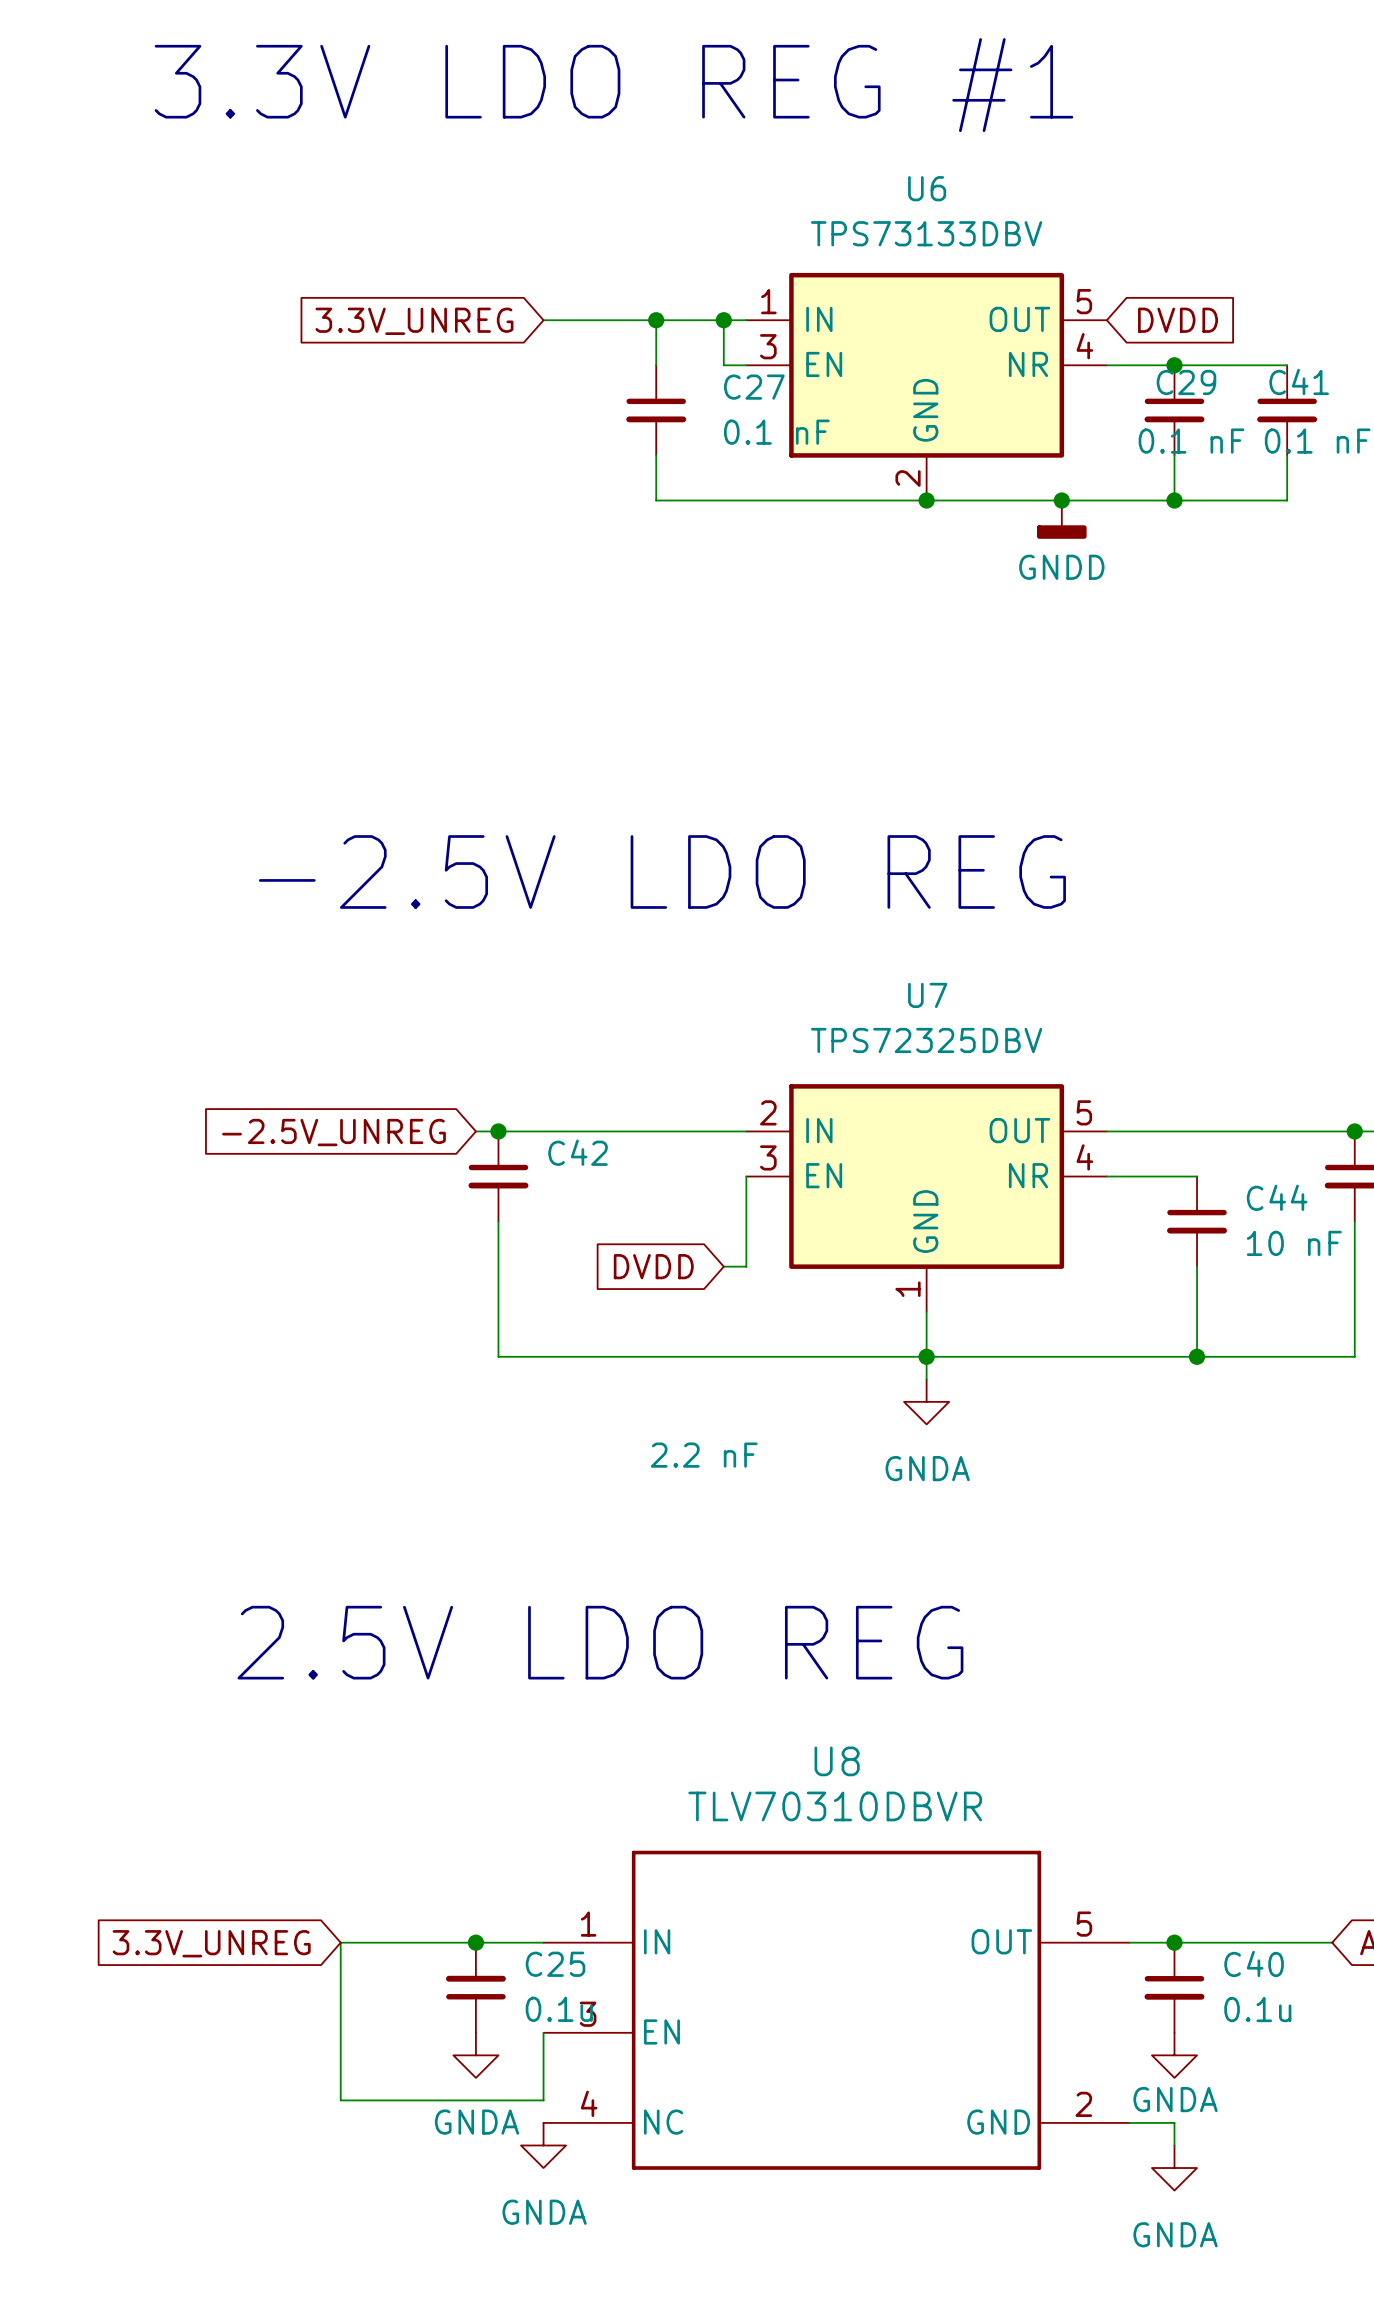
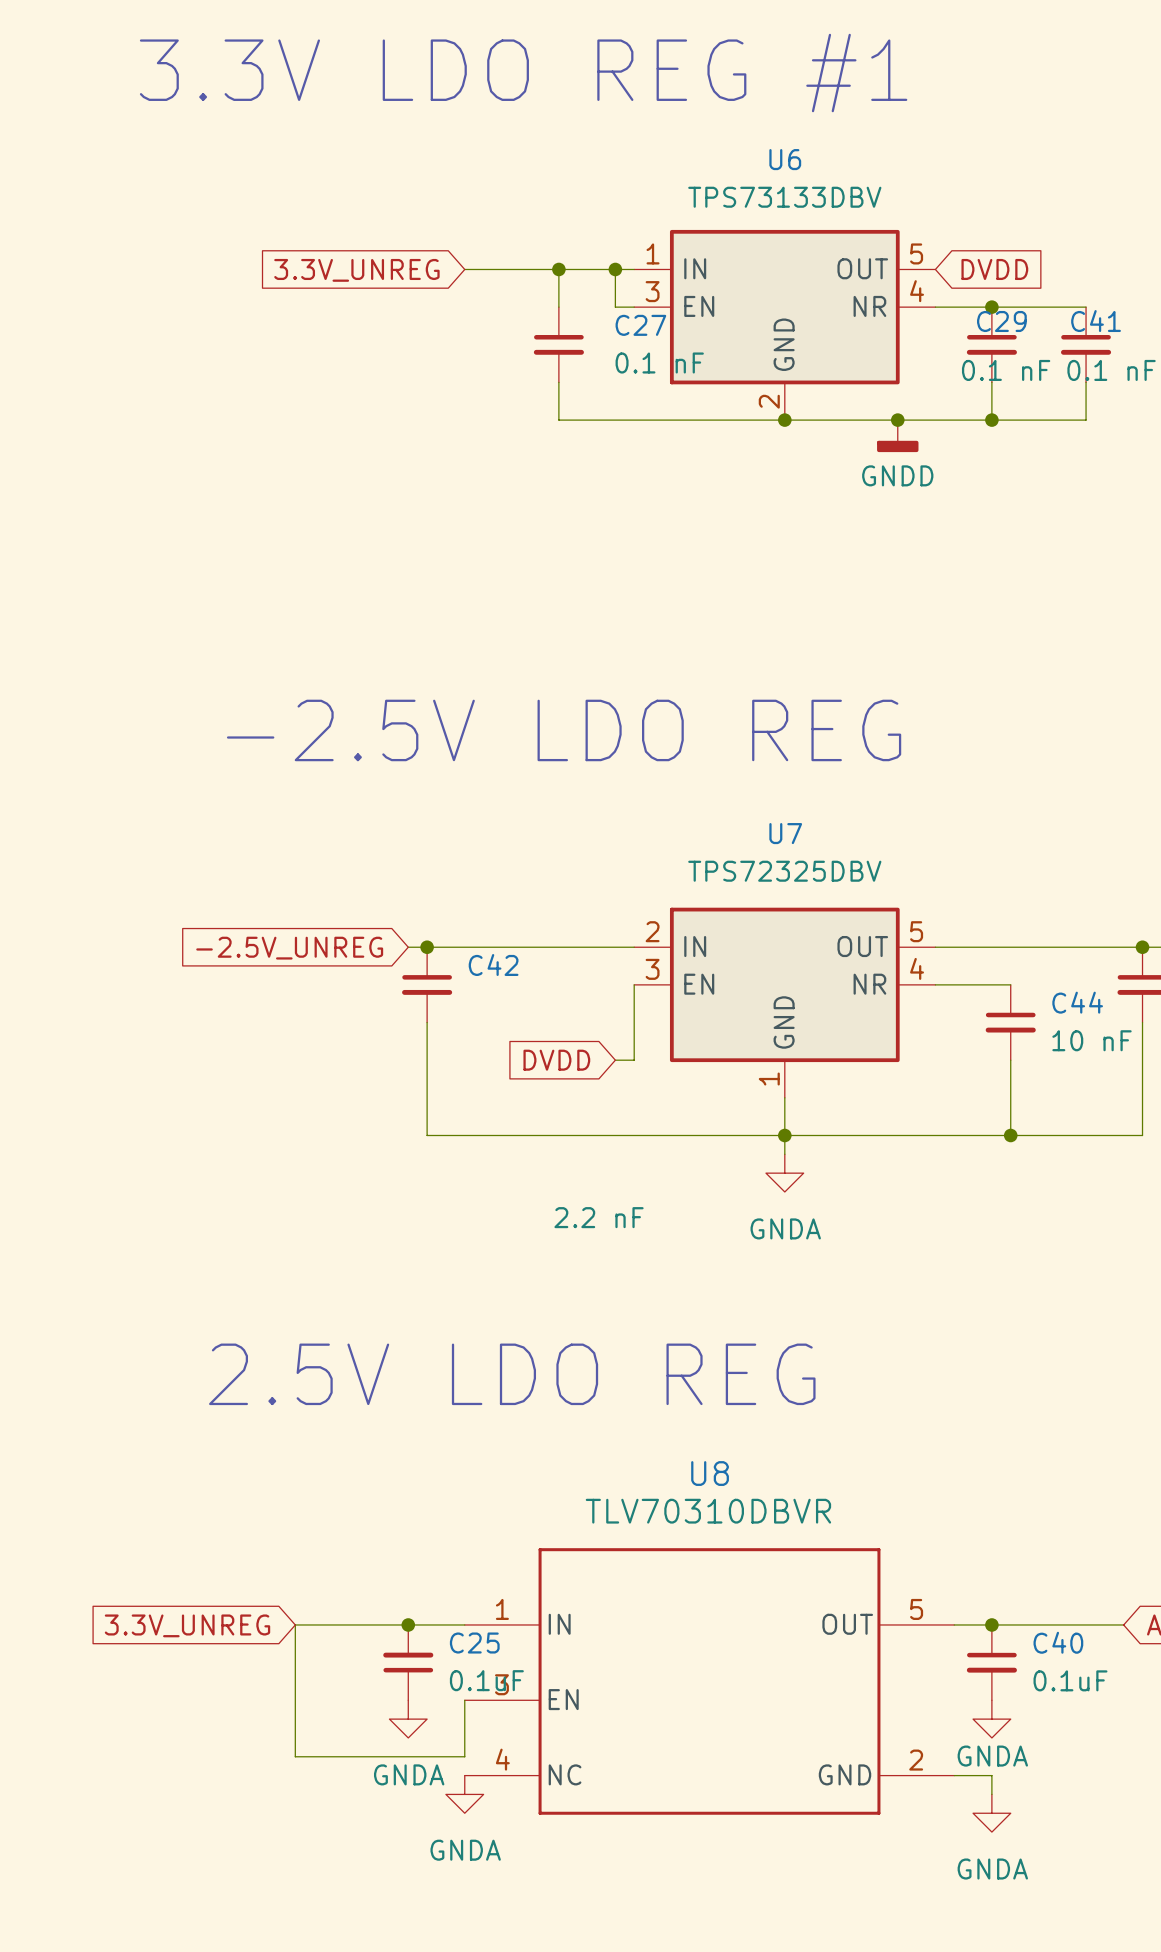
C25 value: 0.1u (559, 2009) -> 0.1uF (486, 1680)
C40 value: 0.1u (1257, 2009) -> 0.1uF (1070, 1680)

